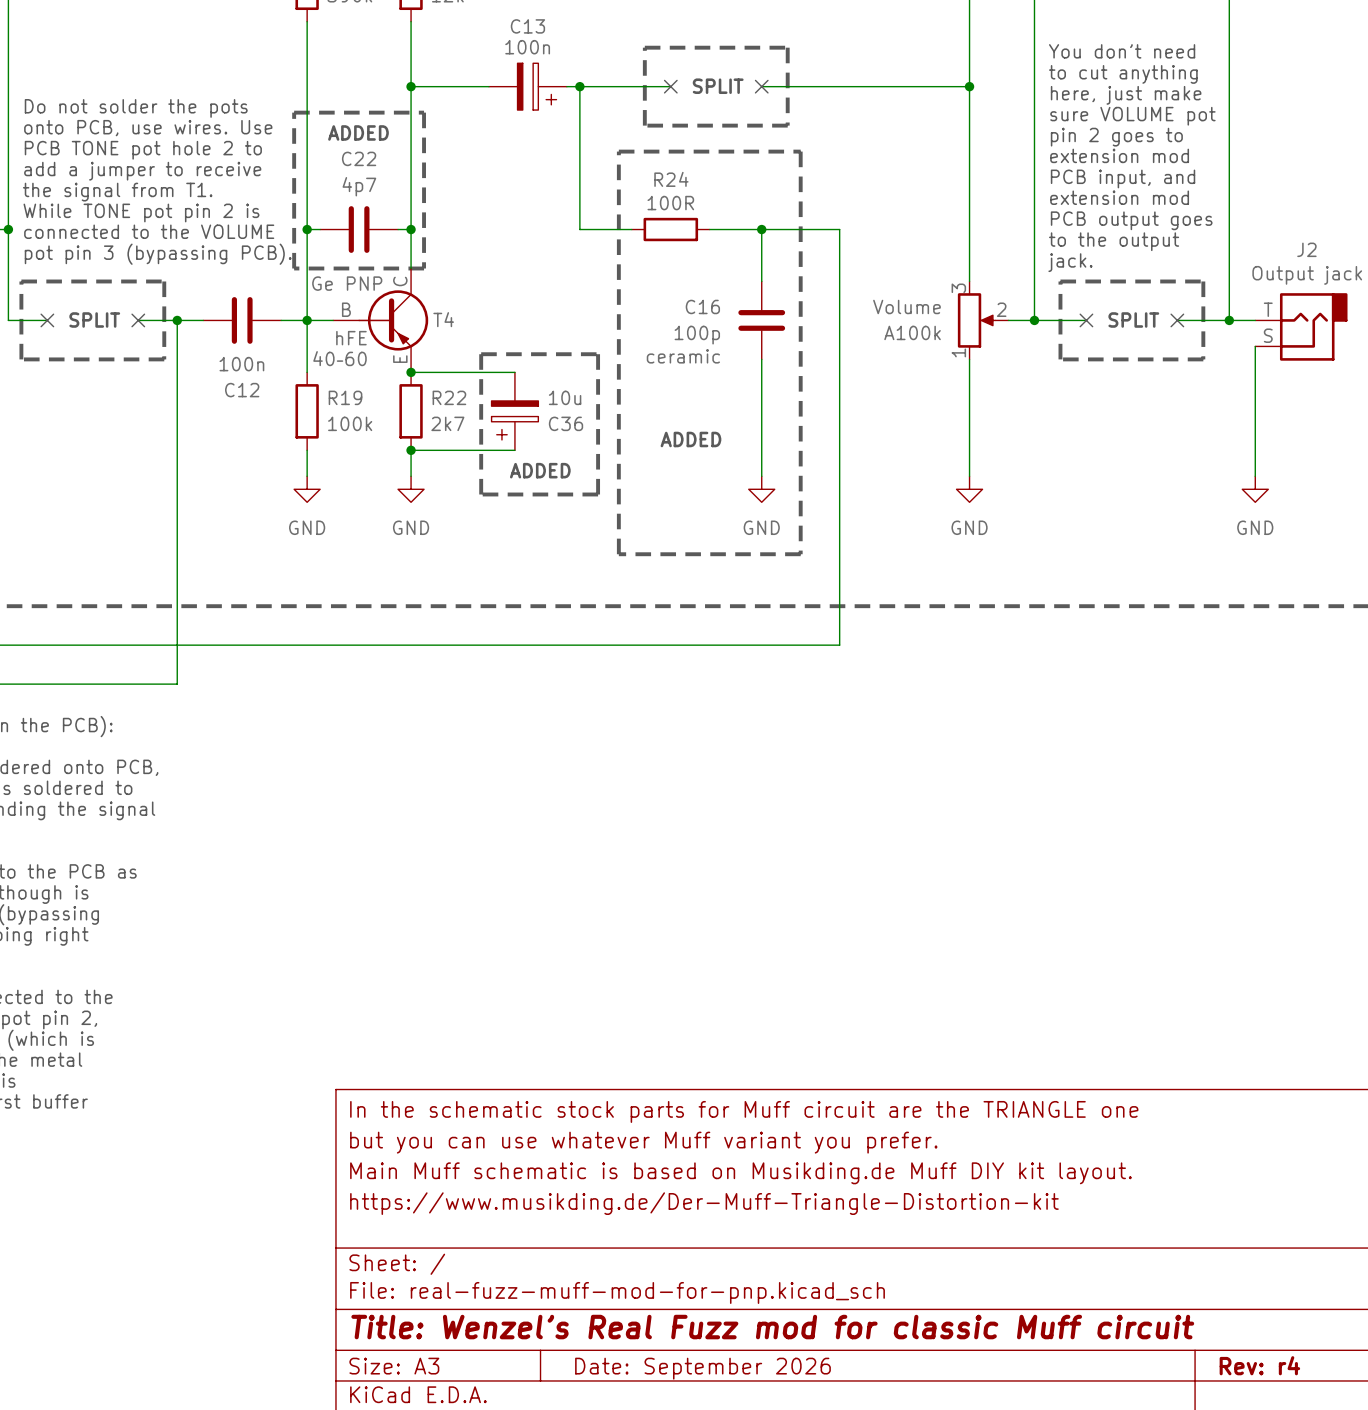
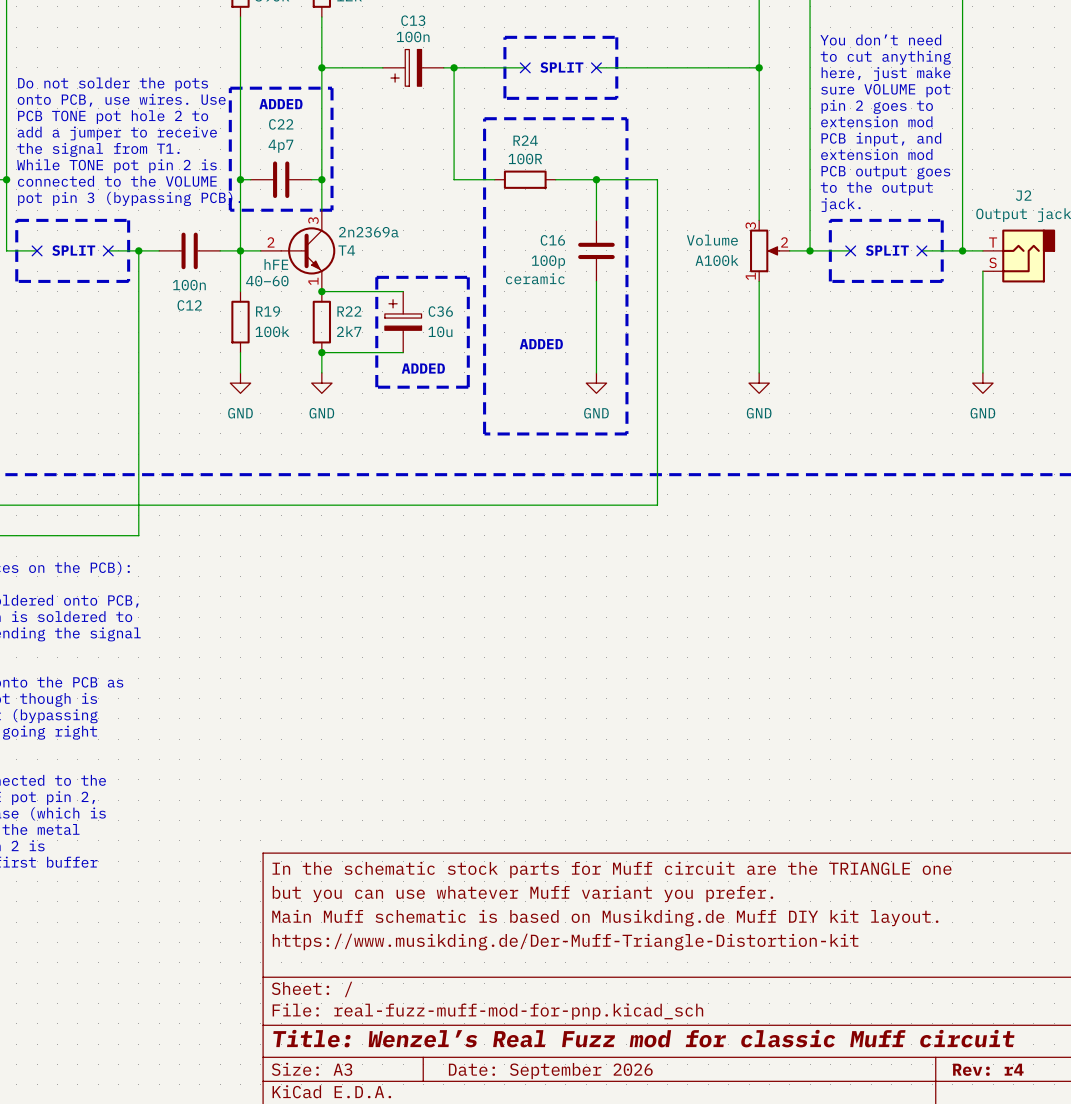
C13 flip: as is (537, 86) -> left-right (406, 67)
T4 symbol: [333, 268, 429, 373] -> [260, 210, 336, 292]
T4 value: Ge PNP (347, 283) -> 2n2369a (368, 232)
C36 flip: as is (514, 420) -> up-down (403, 314)

